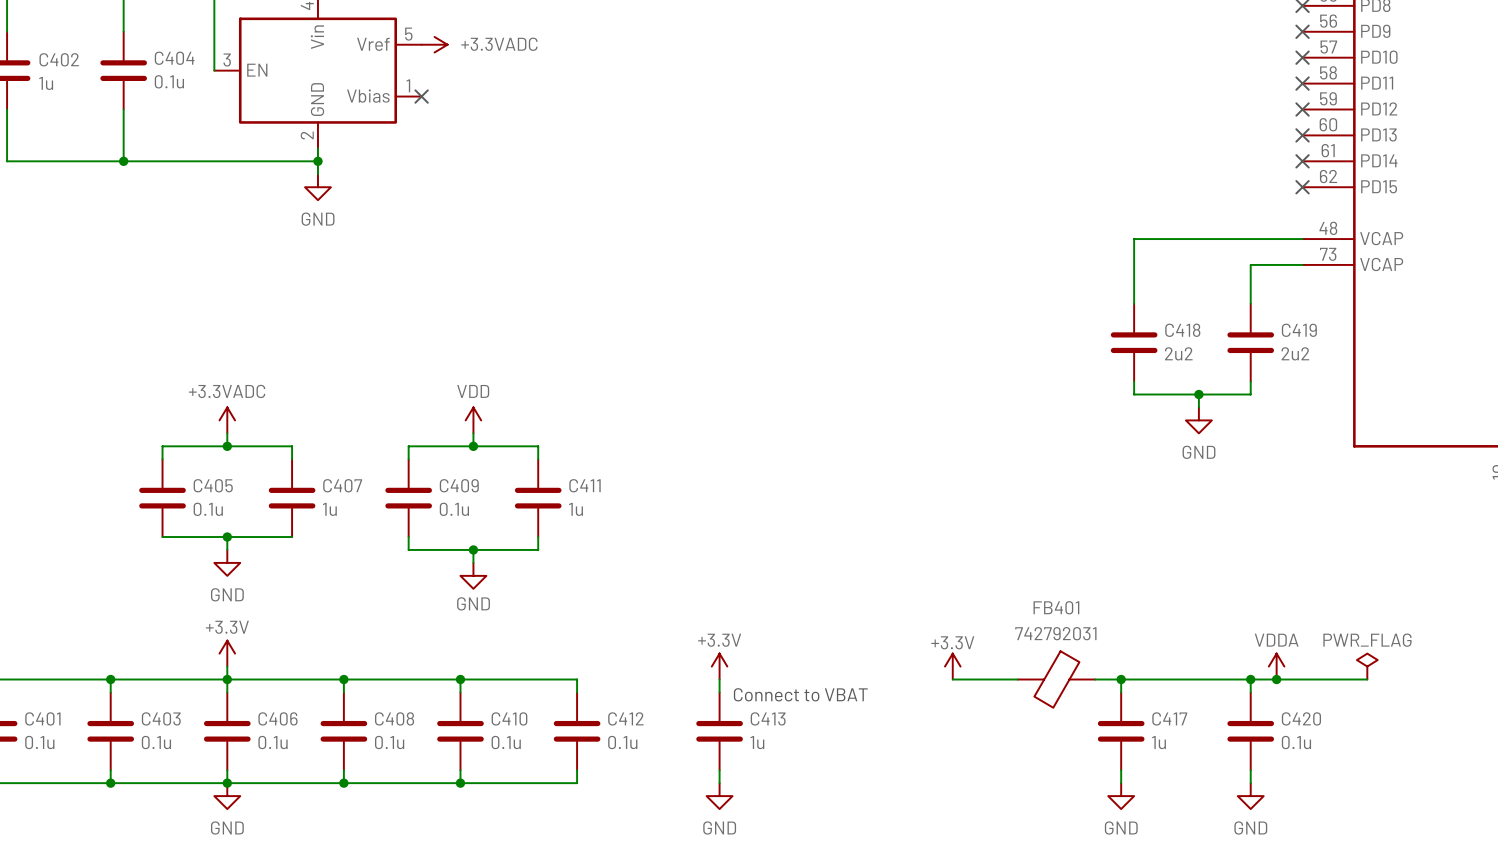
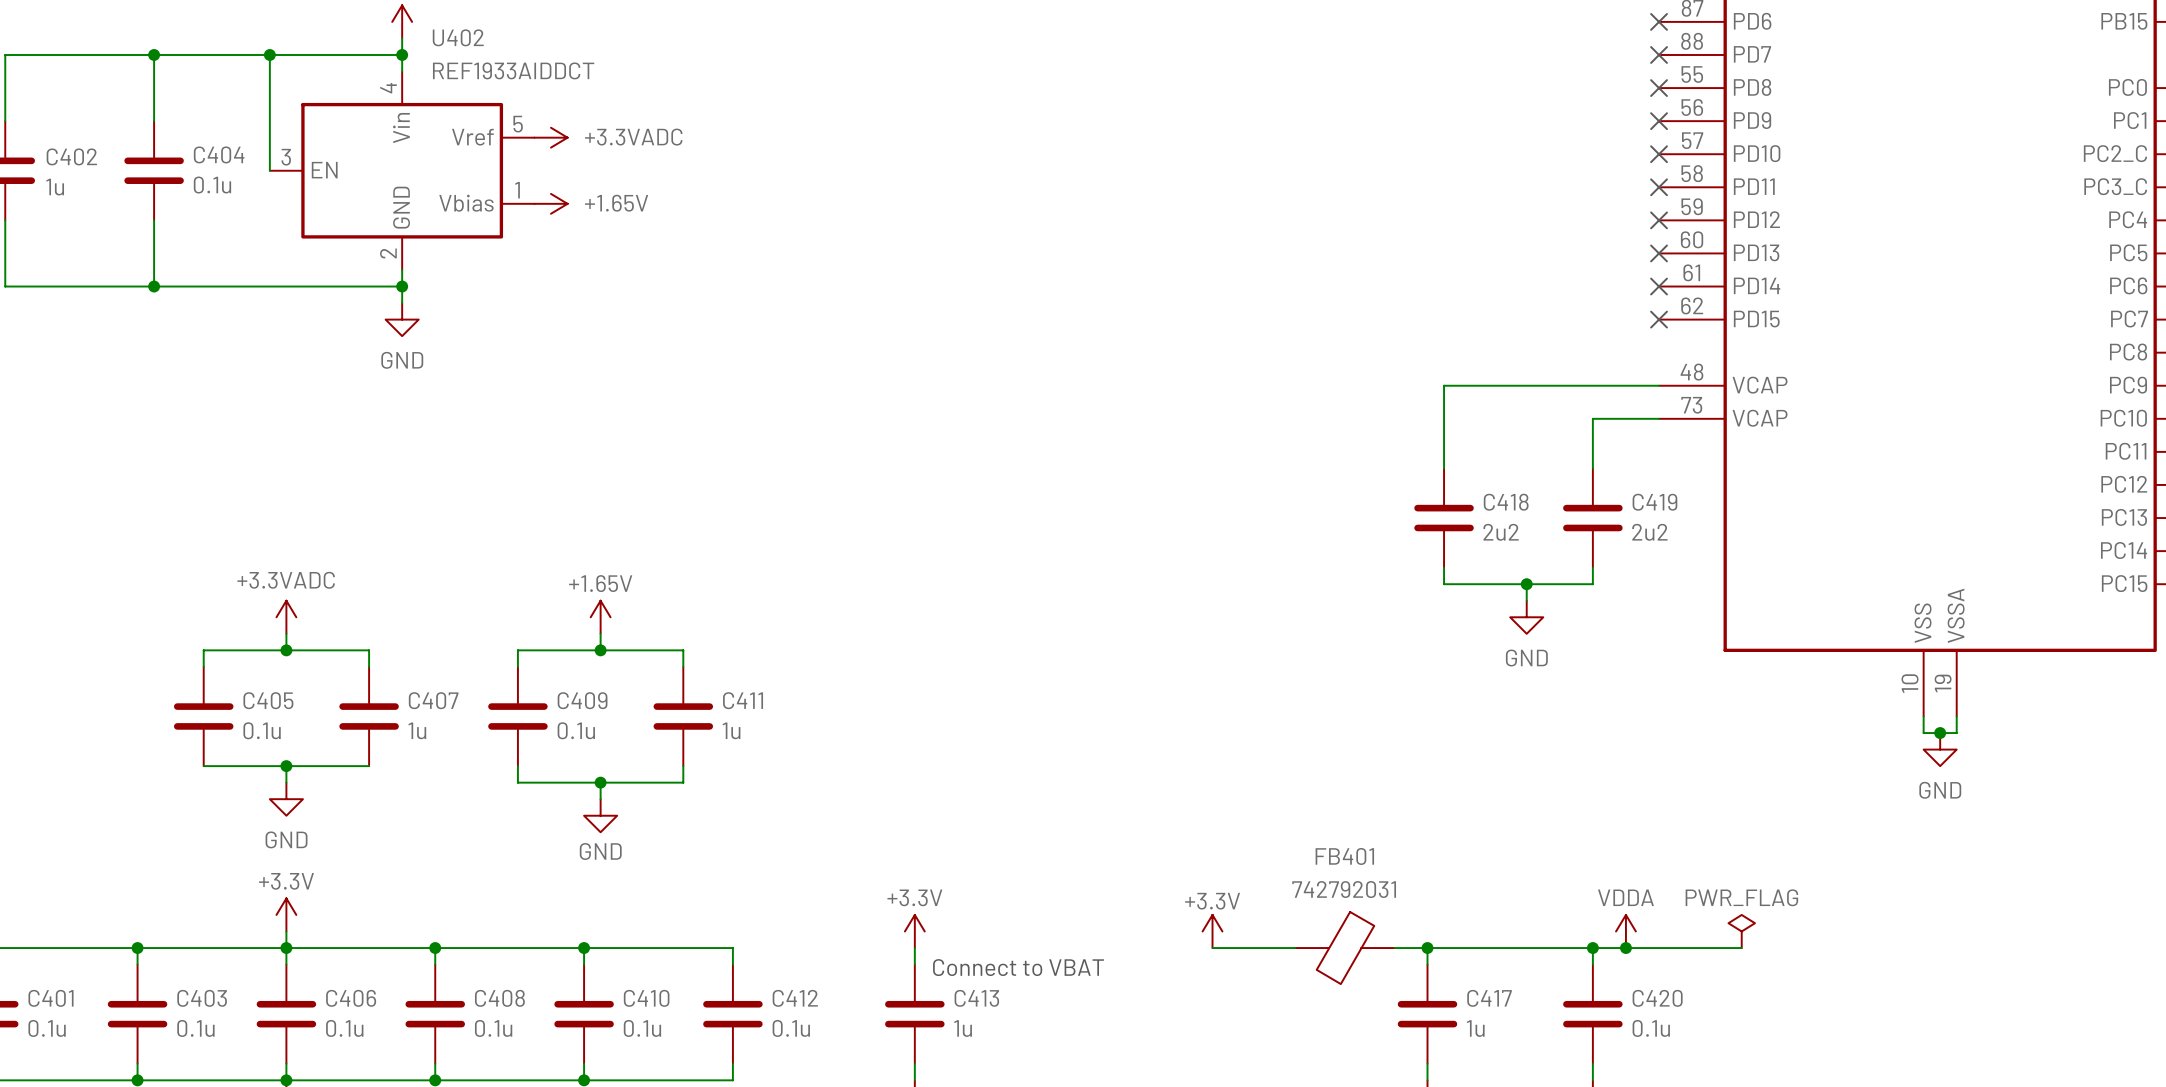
no-connect mark: (421, 96) -> none
power symbol: none -> +1.65V (551, 203)
power symbol: VDD (473, 420) -> +1.65V (600, 617)

